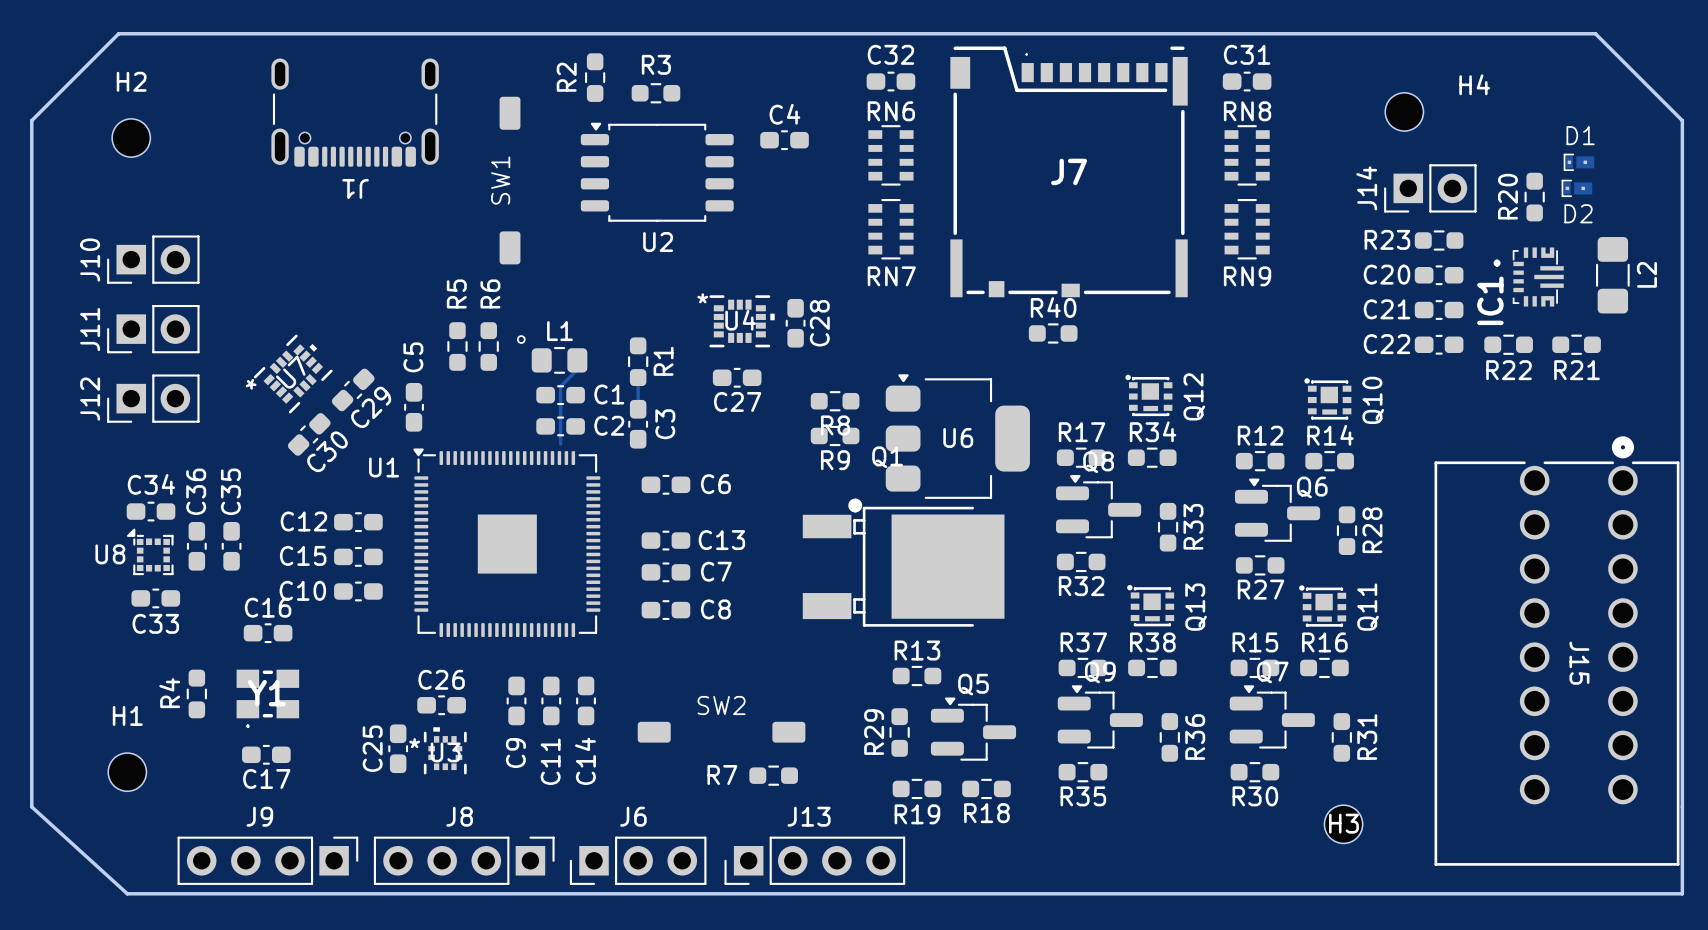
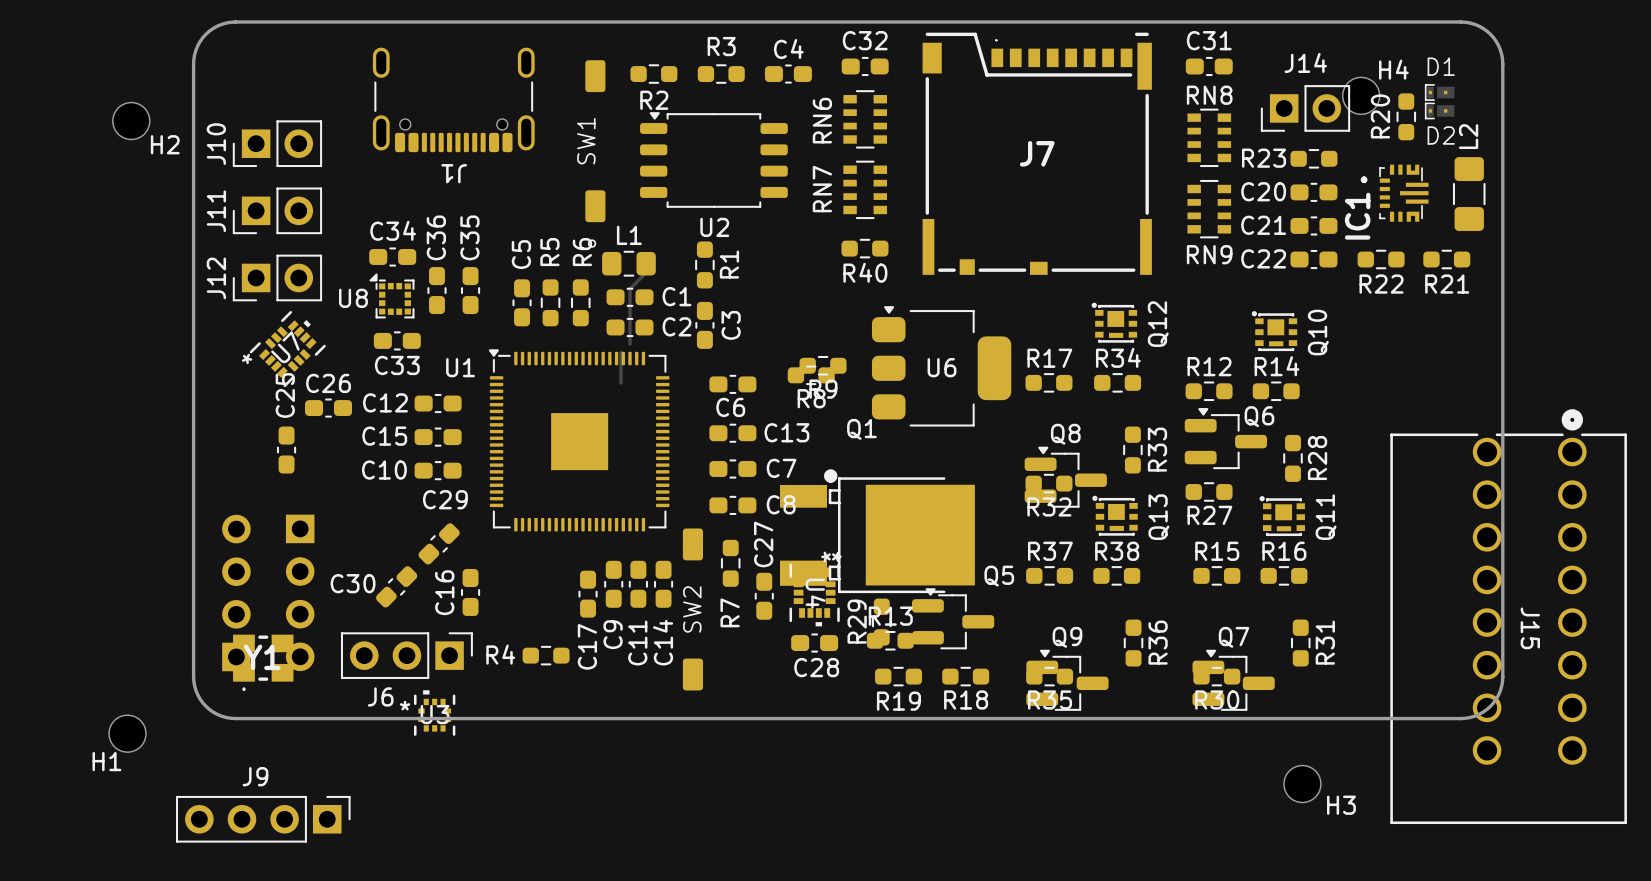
board edge: (118, 33) (1595, 33) (1682, 120) (1682, 893) (127, 893) (31, 806) (31, 120) (118, 33) -> (235, 22) (217, 26) (205, 34) (197, 45) (193, 63) (193, 676) (194, 685) (200, 698) (205, 706) (217, 714) (235, 718) (1460, 718) (1470, 717) (1483, 712) (1493, 702) (1498, 694) (1502, 676) (1502, 63) (1500, 50) (1496, 41) (1490, 34) (1479, 26) (1460, 22) (235, 22)
R2 name position: R2 (566, 77) -> R2 (654, 100)
R2 rotation: 0° (595, 77) -> 90° clockwise (653, 74)
R2 position: (595, 77) -> (653, 74)
H2 name position: H2 (131, 81) -> H2 (165, 144)
H4 name position: H4 (1474, 84) -> H4 (1393, 69)
R3 position: (655, 93) -> (721, 74)
RN6 name rotation: 0° (891, 111) -> 90° counterclockwise (822, 120)
J1 position: (355, 112) -> (453, 99)
C4 position: (784, 140) -> (788, 74)
RN6 position: (890, 155) -> (865, 119)
D1 position: (1578, 162) -> (1439, 92)
U2 position: (657, 172) -> (713, 159)
SW1 position: (510, 180) -> (595, 141)
J14 name rotation: 0° (1366, 188) -> 90° clockwise (1305, 62)
J14 name position: J14 (1366, 188) -> J14 (1305, 62)
J14 position: (1430, 188) -> (1305, 108)
D2 position: (1576, 188) -> (1439, 110)
R20 position: (1534, 197) -> (1406, 116)
RN7 position: (890, 229) -> (865, 189)
R23 position: (1439, 240) -> (1313, 158)
J10 position: (153, 259) -> (277, 143)
L2 name position: L2 (1646, 274) -> L2 (1468, 136)
C20 position: (1439, 275) -> (1313, 192)
L2 position: (1612, 275) -> (1469, 194)
RN7 name rotation: 0° (891, 276) -> 90° counterclockwise (822, 189)
RN7 name position: RN7 (891, 276) -> RN7 (822, 189)
IC1 position: (1528, 277) -> (1394, 193)
R40 name position: R40 (1053, 307) -> R40 (865, 272)
C21 position: (1439, 310) -> (1313, 225)
U4 rotation: 0° (742, 321) -> 90° clockwise (814, 594)
U4 position: (742, 321) -> (814, 594)
C28 rotation: 0° (795, 323) -> 90° clockwise (814, 643)
C28 position: (795, 323) -> (814, 643)
J11 position: (153, 329) -> (277, 210)
R40 position: (1053, 333) -> (864, 248)
C22 position: (1439, 344) -> (1313, 259)
R22 position: (1508, 344) -> (1381, 259)
R21 position: (1576, 344) -> (1446, 259)
R5 position: (457, 346) -> (550, 302)
R6 position: (488, 346) -> (580, 302)
L1 position: (552, 354) -> (621, 258)
track: (577, 360) (577, 369) (560, 386) (560, 443) -> (646, 263) (646, 272) (630, 288) (630, 344)
R1 position: (638, 361) -> (704, 264)
C27 rotation: 0° (737, 377) -> 90° clockwise (764, 596)
C27 position: (737, 377) -> (764, 596)
C29 position: (353, 389) -> (439, 543)
C1 position: (560, 395) -> (630, 297)
Q12 position: (1148, 395) -> (1114, 322)
J12 position: (153, 398) -> (277, 277)
Q10 position: (1327, 398) -> (1274, 331)
C27 name position: C27 (737, 401) -> C27 (763, 544)
C29 name rotation: 0° (371, 407) -> 45° clockwise (445, 499)
C5 position: (414, 407) -> (522, 302)
C3 position: (638, 424) -> (704, 325)
C2 position: (560, 426) -> (630, 327)
C30 position: (309, 434) -> (396, 586)
R9 position: (835, 435) -> (823, 365)
U6 position: (957, 436) -> (941, 366)
C30 name rotation: 0° (327, 451) -> 45° clockwise (353, 583)
R17 position: (1081, 457) -> (1048, 382)
R34 position: (1152, 457) -> (1117, 382)
R12 position: (1260, 461) -> (1209, 391)
R14 position: (1329, 461) -> (1276, 391)
C6 position: (665, 484) -> (732, 384)
C6 name position: C6 (715, 484) -> C6 (730, 407)
Q6 position: (1277, 510) -> (1225, 438)
C34 position: (151, 511) -> (392, 256)
C12 position: (358, 522) -> (438, 403)
R33 position: (1168, 527) -> (1132, 450)
R28 position: (1347, 530) -> (1292, 458)
C13 position: (665, 540) -> (732, 433)
U1 position: (506, 542) -> (579, 440)
C36 position: (196, 546) -> (436, 290)
C35 position: (231, 546) -> (470, 290)
U8 position: (150, 551) -> (391, 295)
C15 position: (358, 556) -> (438, 437)
R32 position: (1081, 561) -> (1048, 483)
R27 position: (1260, 565) -> (1209, 491)
C7 position: (665, 572) -> (732, 468)
C10 position: (358, 591) -> (438, 470)
C33 position: (155, 598) -> (397, 340)
Q13 position: (1150, 605) -> (1115, 515)
Q11 position: (1322, 605) -> (1282, 516)
C16 name position: C16 (268, 607) -> C16 (444, 592)
C8 position: (665, 610) -> (732, 505)
part: none -> (300, 592)
C16 rotation: 0° (268, 633) -> 90° clockwise (470, 592)
C16 position: (268, 633) -> (470, 592)
R37 position: (1082, 667) -> (1049, 575)
R38 position: (1152, 667) -> (1116, 575)
R15 position: (1254, 667) -> (1216, 575)
R16 position: (1324, 667) -> (1283, 575)
Q5 name position: Q5 (973, 684) -> Q5 (999, 576)
R4 rotation: 0° (196, 693) -> 90° clockwise (546, 655)
R4 position: (196, 693) -> (546, 655)
C9 position: (516, 700) -> (613, 584)
C11 position: (551, 700) -> (638, 584)
C14 position: (586, 700) -> (663, 584)
C26 position: (441, 705) -> (328, 408)
H1 name position: H1 (127, 715) -> H1 (106, 761)
Q5 position: (973, 729) -> (953, 618)
SW2 rotation: 0° (721, 732) -> 90° clockwise (692, 609)
R29 position: (899, 732) -> (881, 622)
R36 position: (1169, 737) -> (1133, 643)
R31 position: (1341, 737) -> (1300, 643)
C25 name position: C25 (372, 748) -> C25 (285, 395)
C25 position: (398, 748) -> (286, 450)
C17 rotation: 0° (266, 754) -> 90° clockwise (588, 594)
C17 position: (266, 754) -> (588, 594)
R35 position: (1082, 772) -> (1049, 676)
R30 position: (1254, 772) -> (1216, 676)
R7 name position: R7 (722, 775) -> R7 (730, 612)
R7 rotation: 0° (773, 775) -> 90° clockwise (730, 563)
R7 position: (773, 775) -> (730, 563)
R19 position: (917, 788) -> (898, 676)
R18 position: (986, 788) -> (965, 676)
H3 name position: H3 (1343, 823) -> H3 (1341, 805)
J8 side: top (464, 860) -> bottom (236, 593)
J6 rotation: 0° (638, 860) -> 180° (406, 655)
J6 position: (638, 860) -> (406, 655)
J13: (814, 860) -> none

